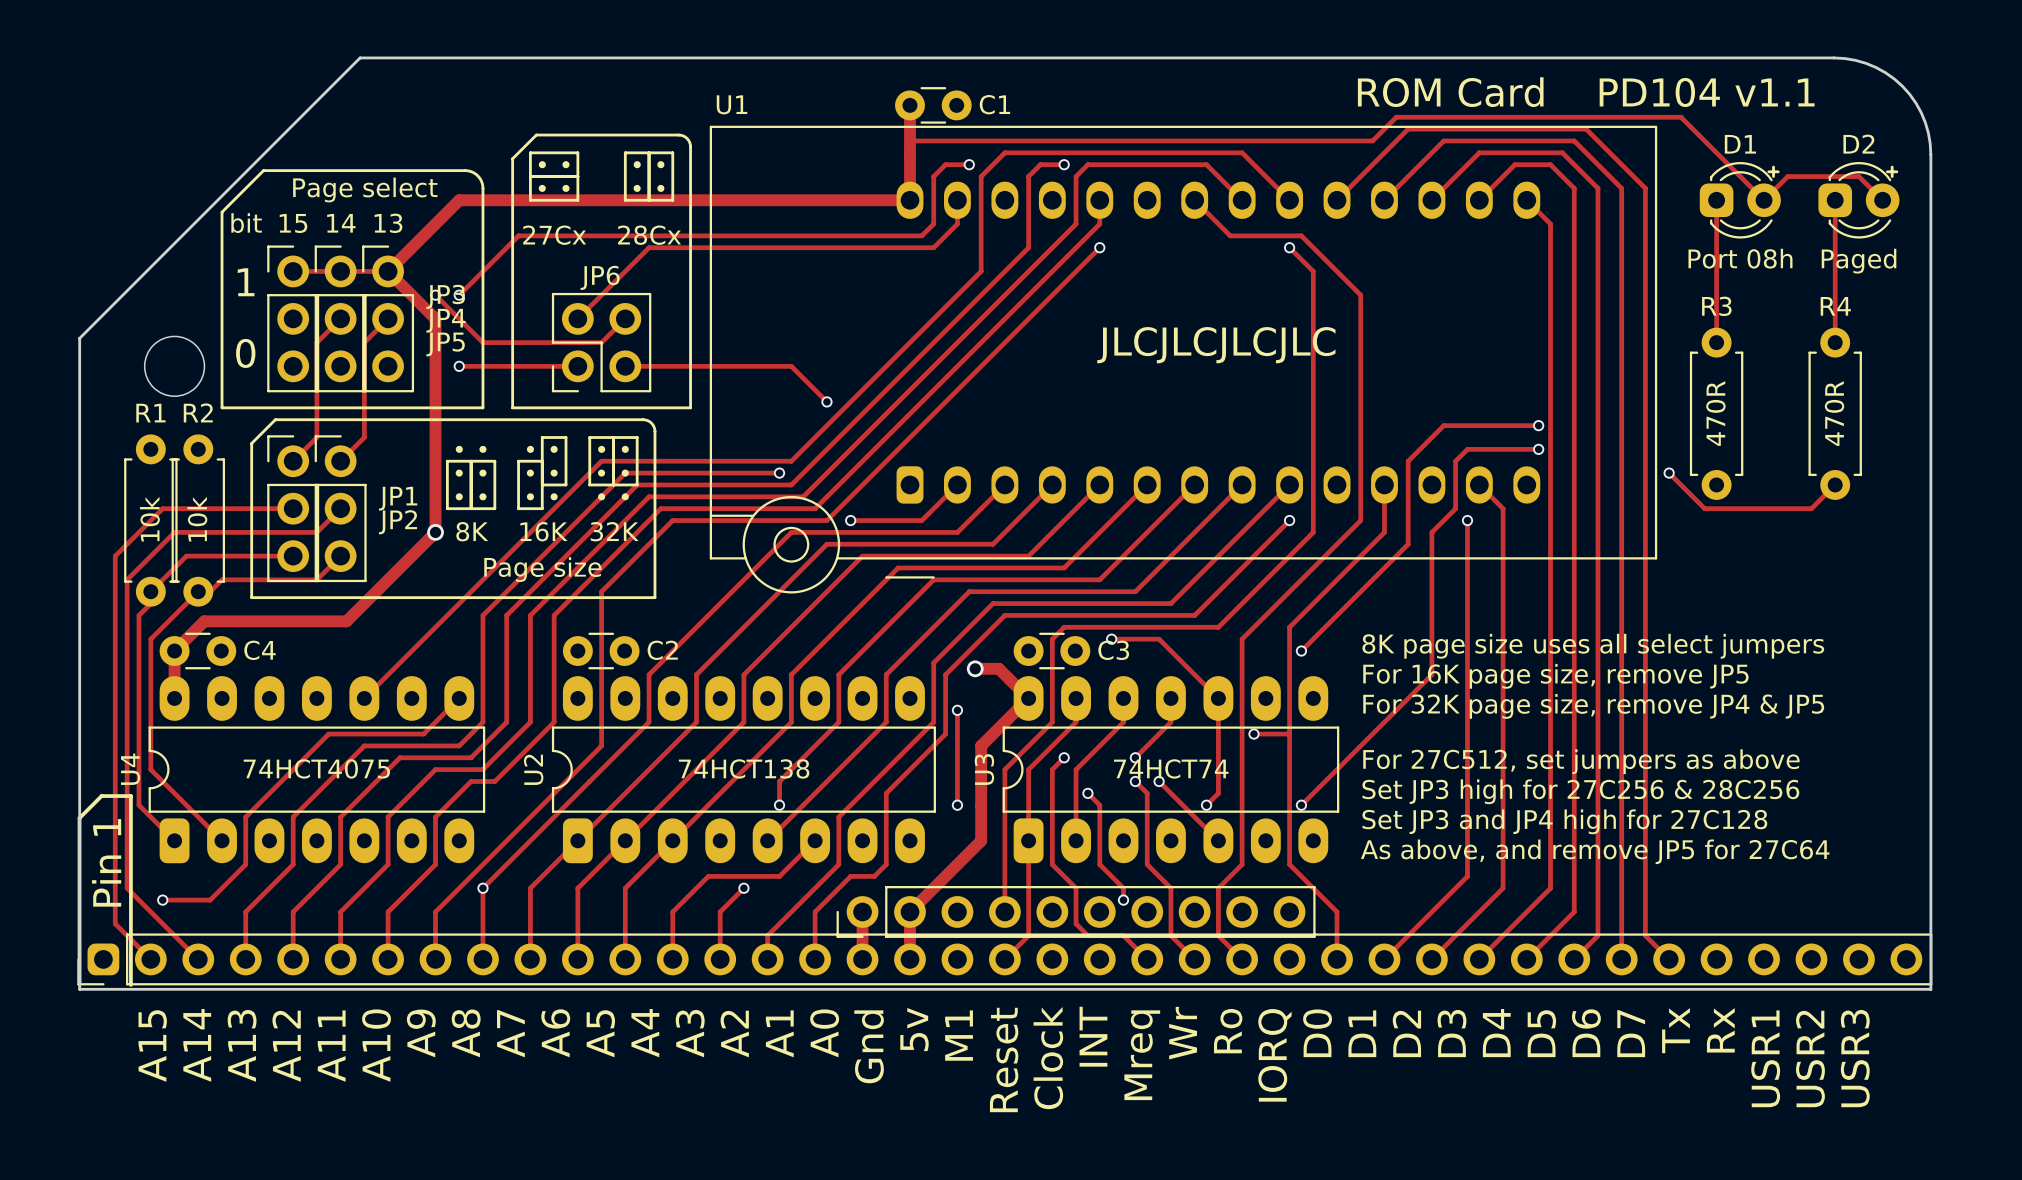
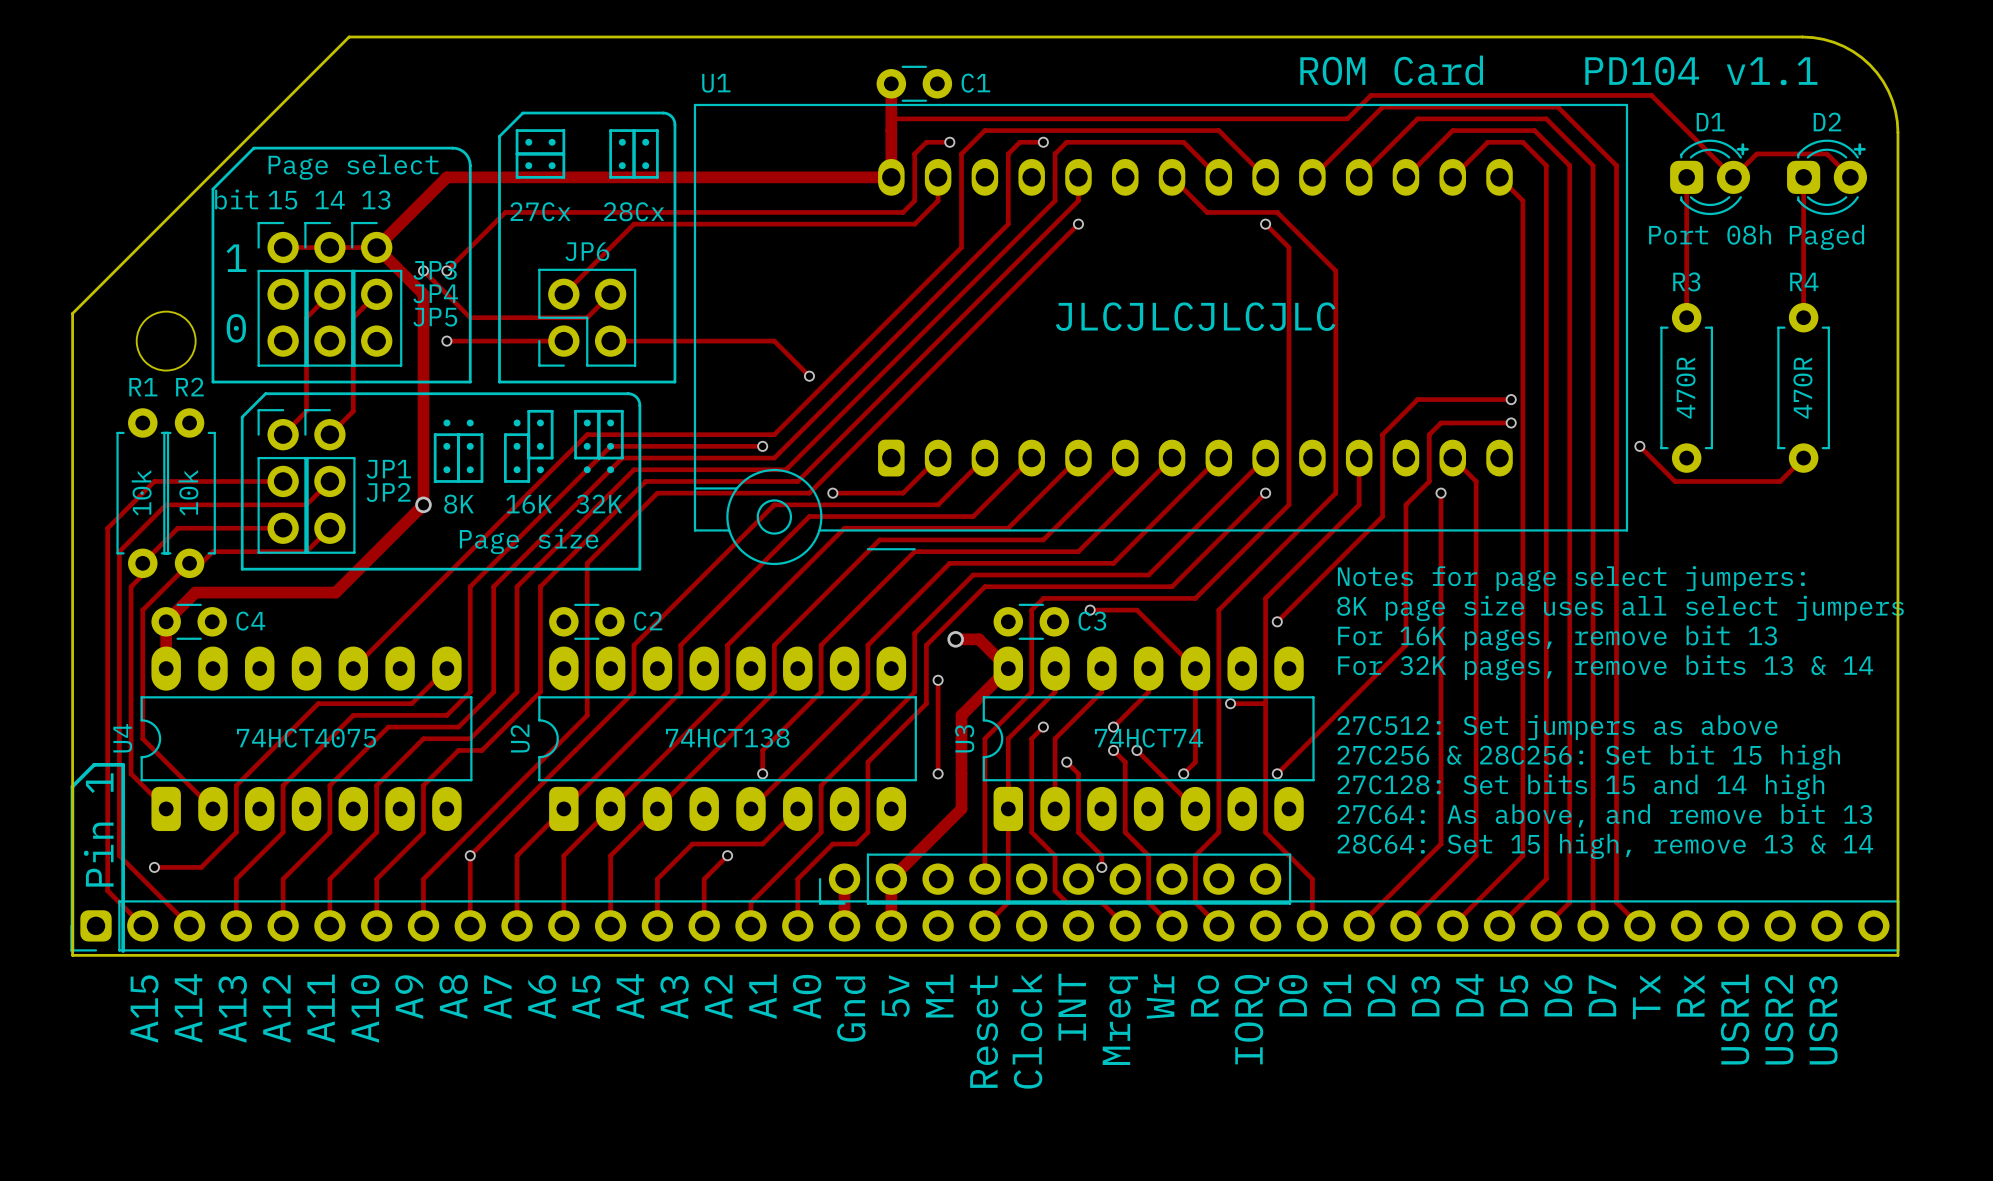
text: none -> Notes for page select jumpers: (1571, 578)
text position: 8K page size uses all select jumpers (1593, 646) -> 8K page size uses all select jumpers (1620, 608)
text: For 16K page size, remove JP5 (1555, 676) -> For 16K pages, remove bit 13 (1557, 638)
text: For 32K page size, remove JP4 & JP5 (1593, 706) -> For 32K pages, remove bits 13 & 14 (1605, 667)
text: For 27C512, set jumpers as above (1581, 761) -> 27C512: Set jumpers as above (1557, 727)
text: Set JP3 high for 27C256 & 28C256 (1580, 791) -> 27C256 & 28C256: Set bit 15 high (1588, 757)
text: Set JP3 and JP4 high for 27C128 (1564, 821) -> 27C128: Set bits 15 and 14 high (1580, 787)
text: As above, and remove JP5 for 27C64 (1595, 851) -> 27C64: As above, and remove bit 13 (1604, 815)
text: none -> 28C64: Set 15 high, remove 13 & 14 (1605, 846)

